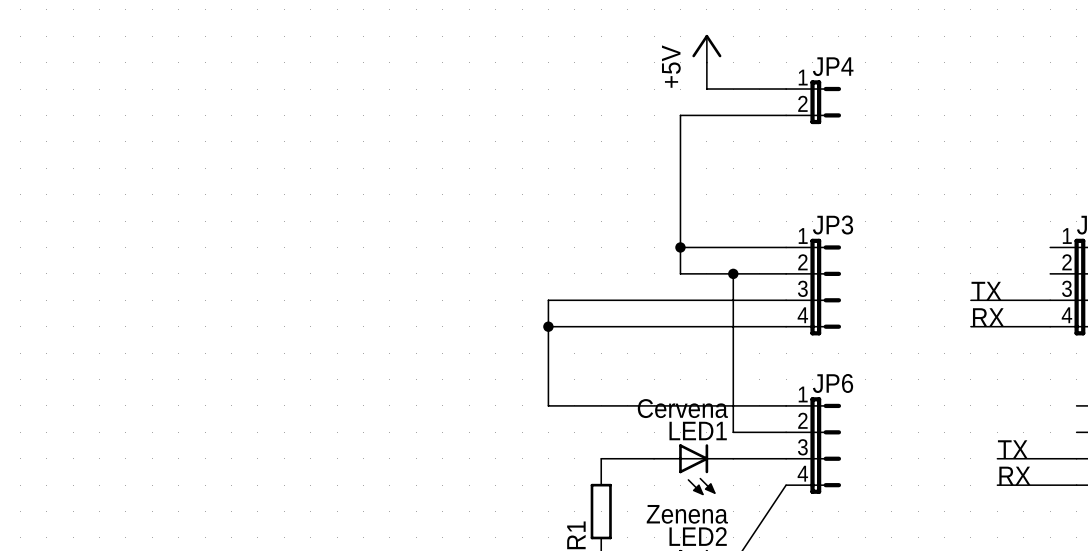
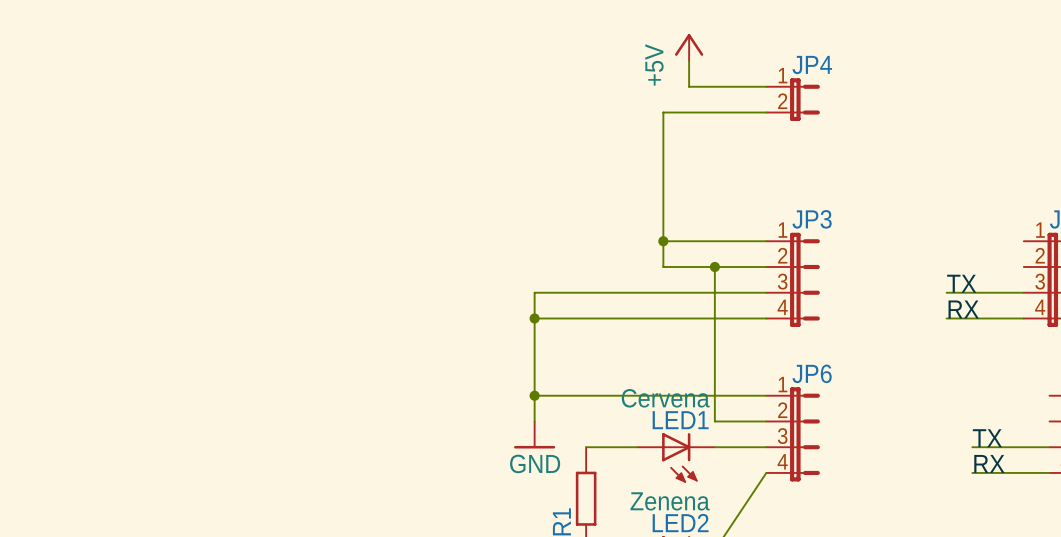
wire: none -> (534, 395) (534, 421)
junction: none -> (534, 395)
power symbol: none -> GND (534, 434)

